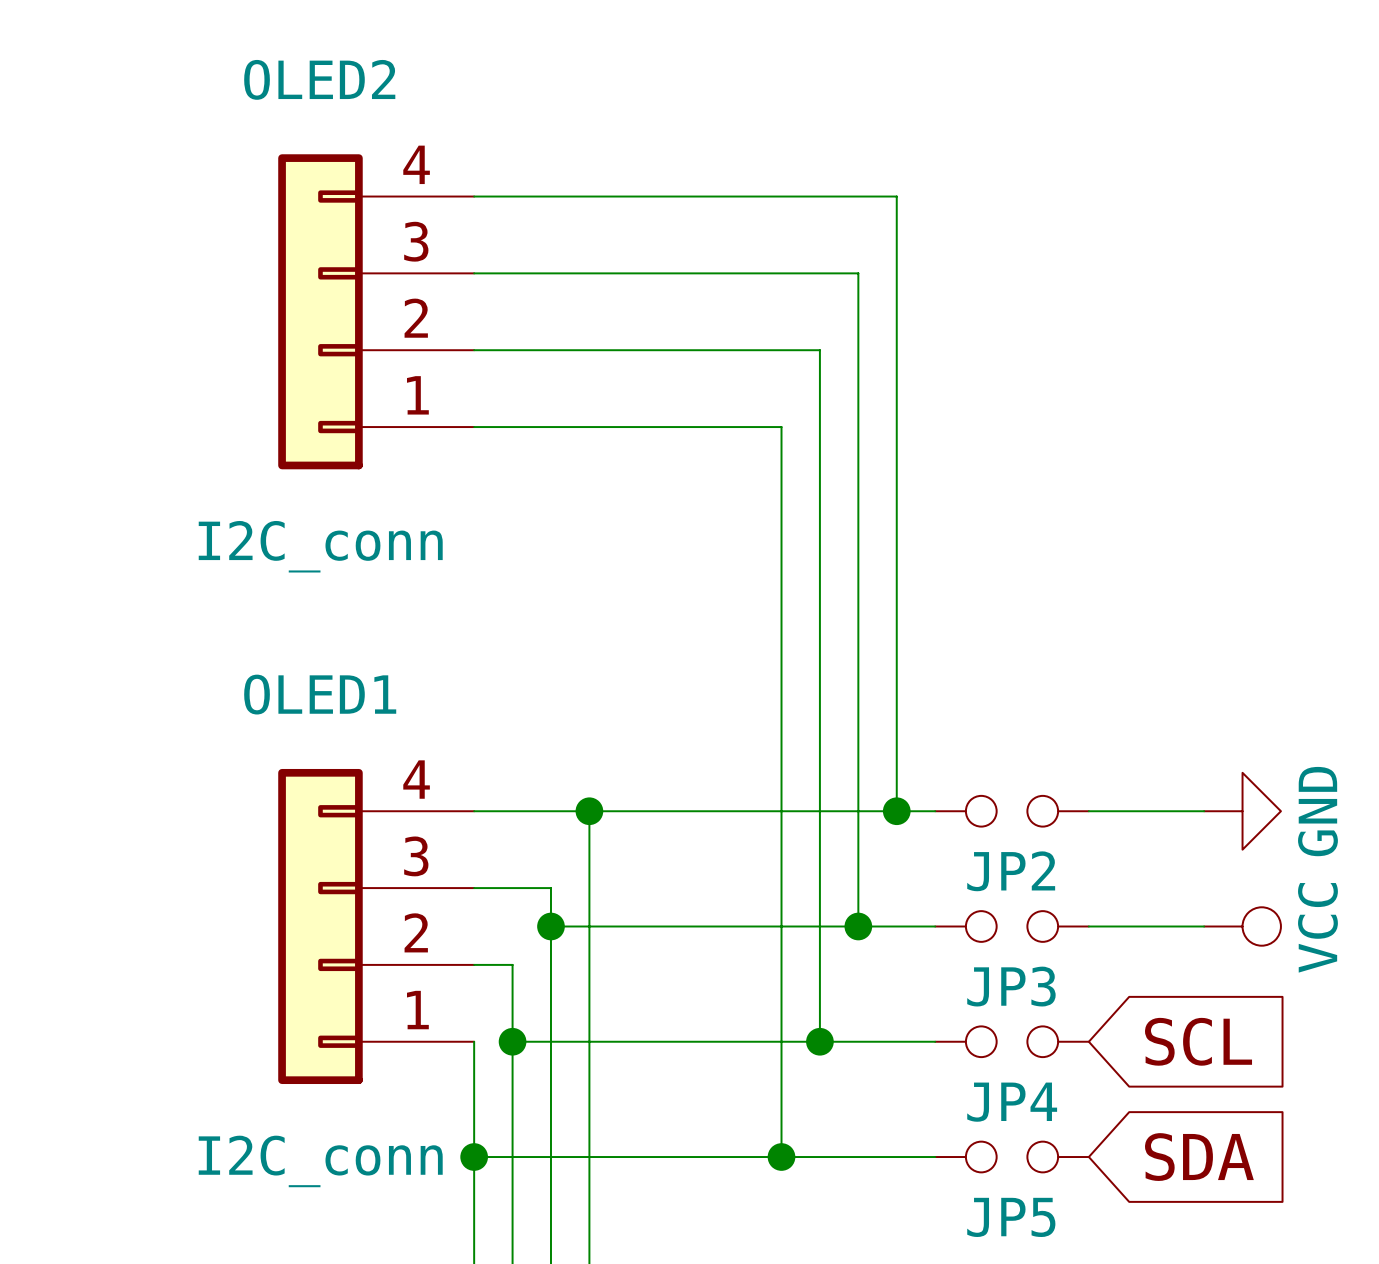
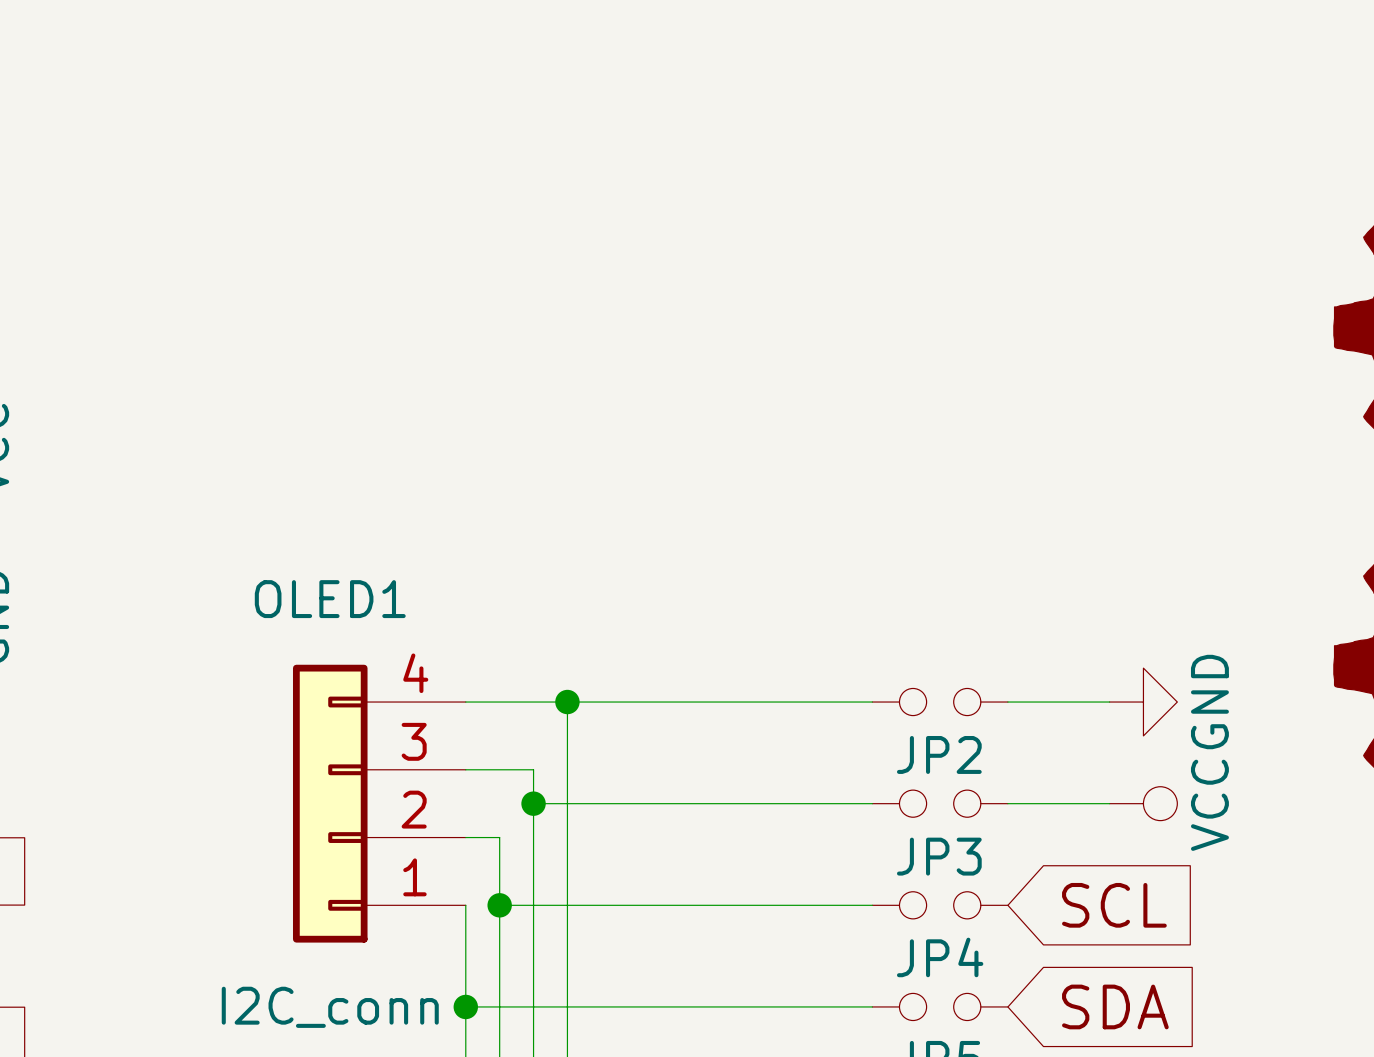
wire: (474, 196) (896, 196) (896, 811) -> none
wire: (474, 273) (858, 273) (858, 926) -> none
OLED2: I2C_conn (376, 311) -> none
wire: (474, 350) (819, 350) (819, 1041) -> none
wire: (474, 427) (781, 427) (781, 1157) -> none
junction: (896, 811) -> none
junction: (858, 926) -> none
junction: (819, 1041) -> none
junction: (781, 1157) -> none

